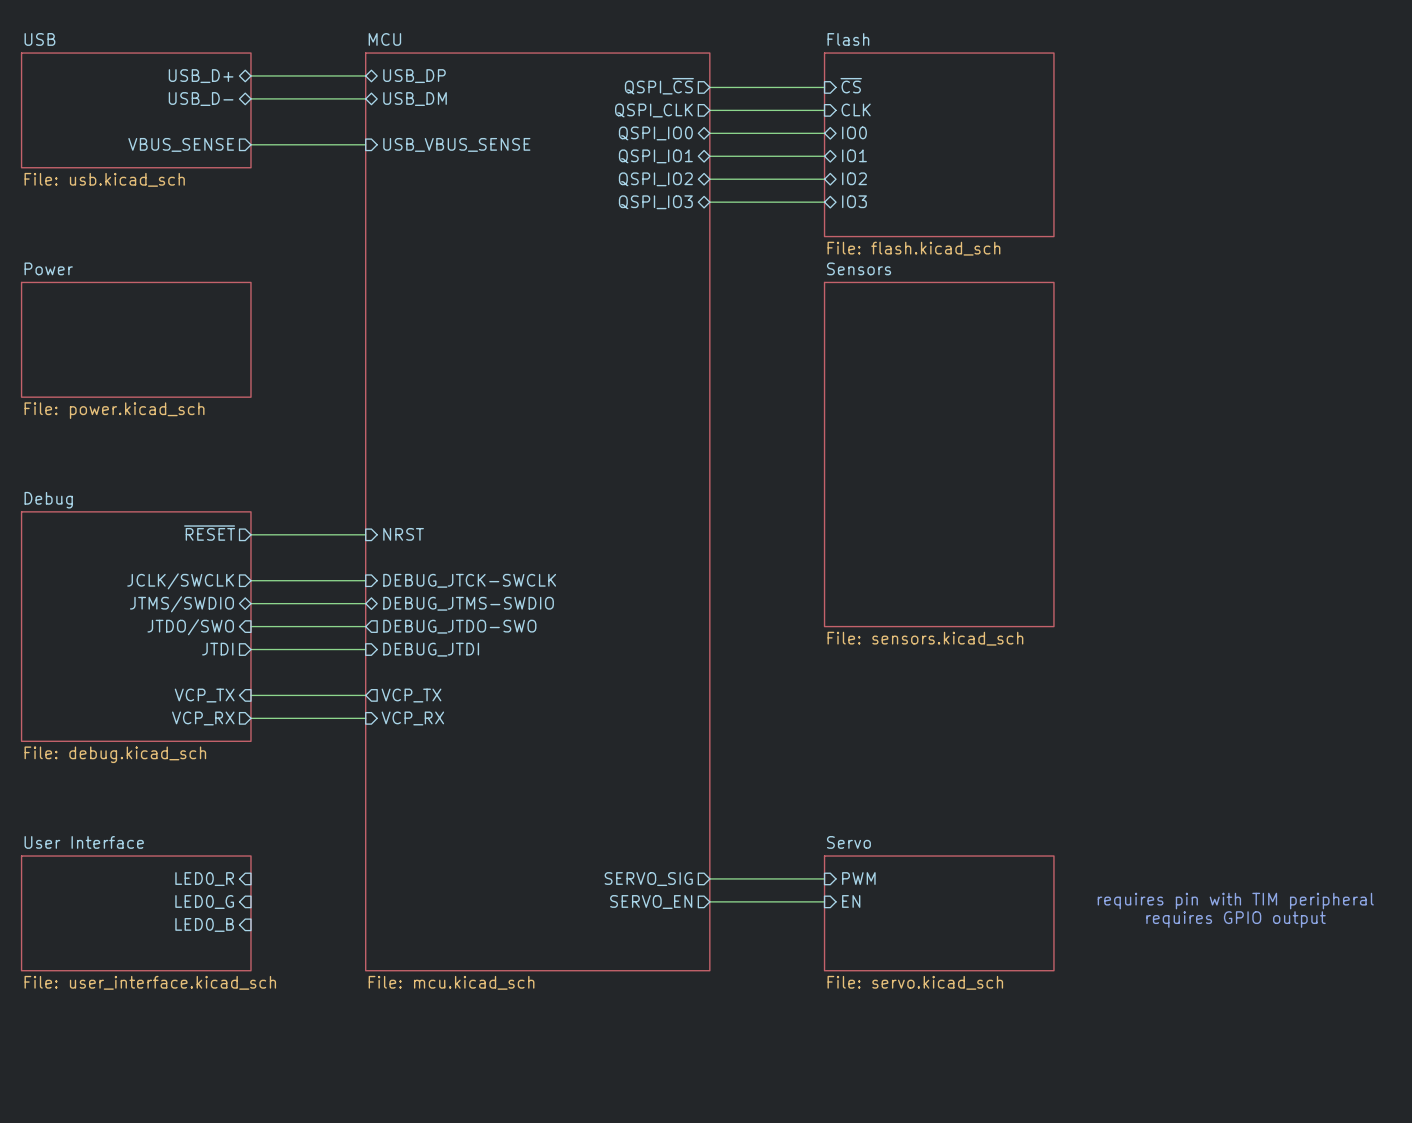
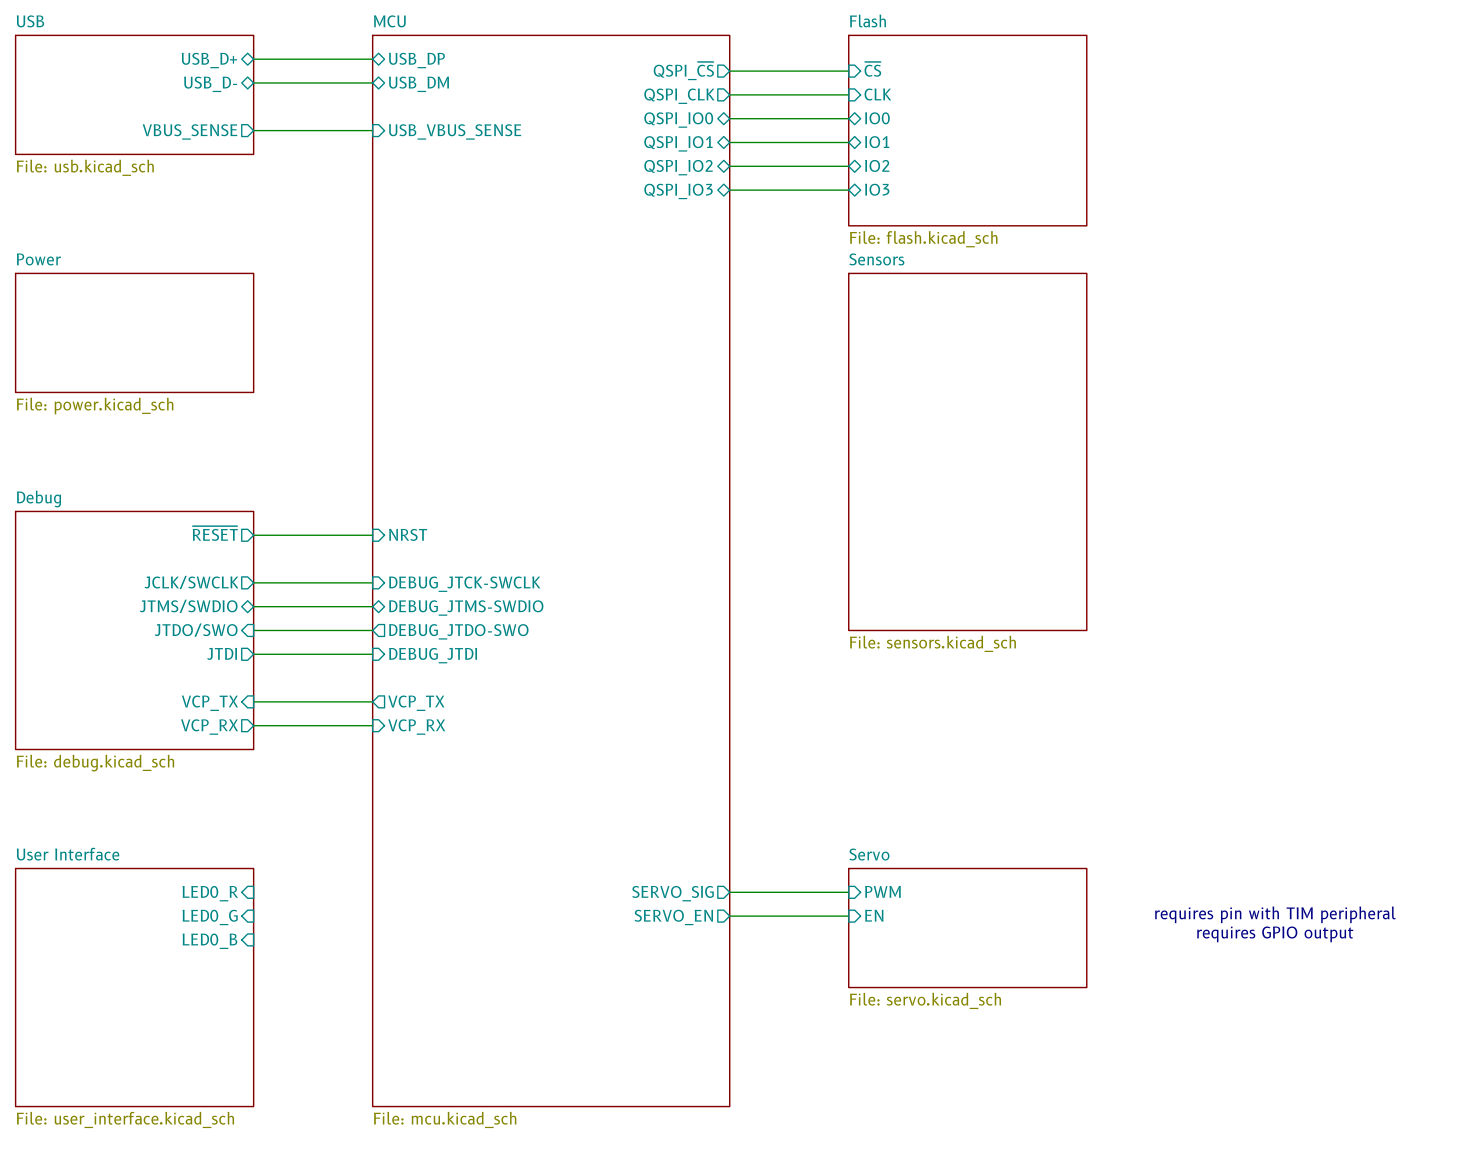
sheet MCU: File: mcu.kicad_sch (537, 511) -> none
sheet MCU: none -> File: mcu.kicad_sch (551, 570)
sheet User Interface: File: user_interface.kicad_sch (136, 913) -> none
sheet User Interface: none -> File: user_interface.kicad_sch (134, 987)

